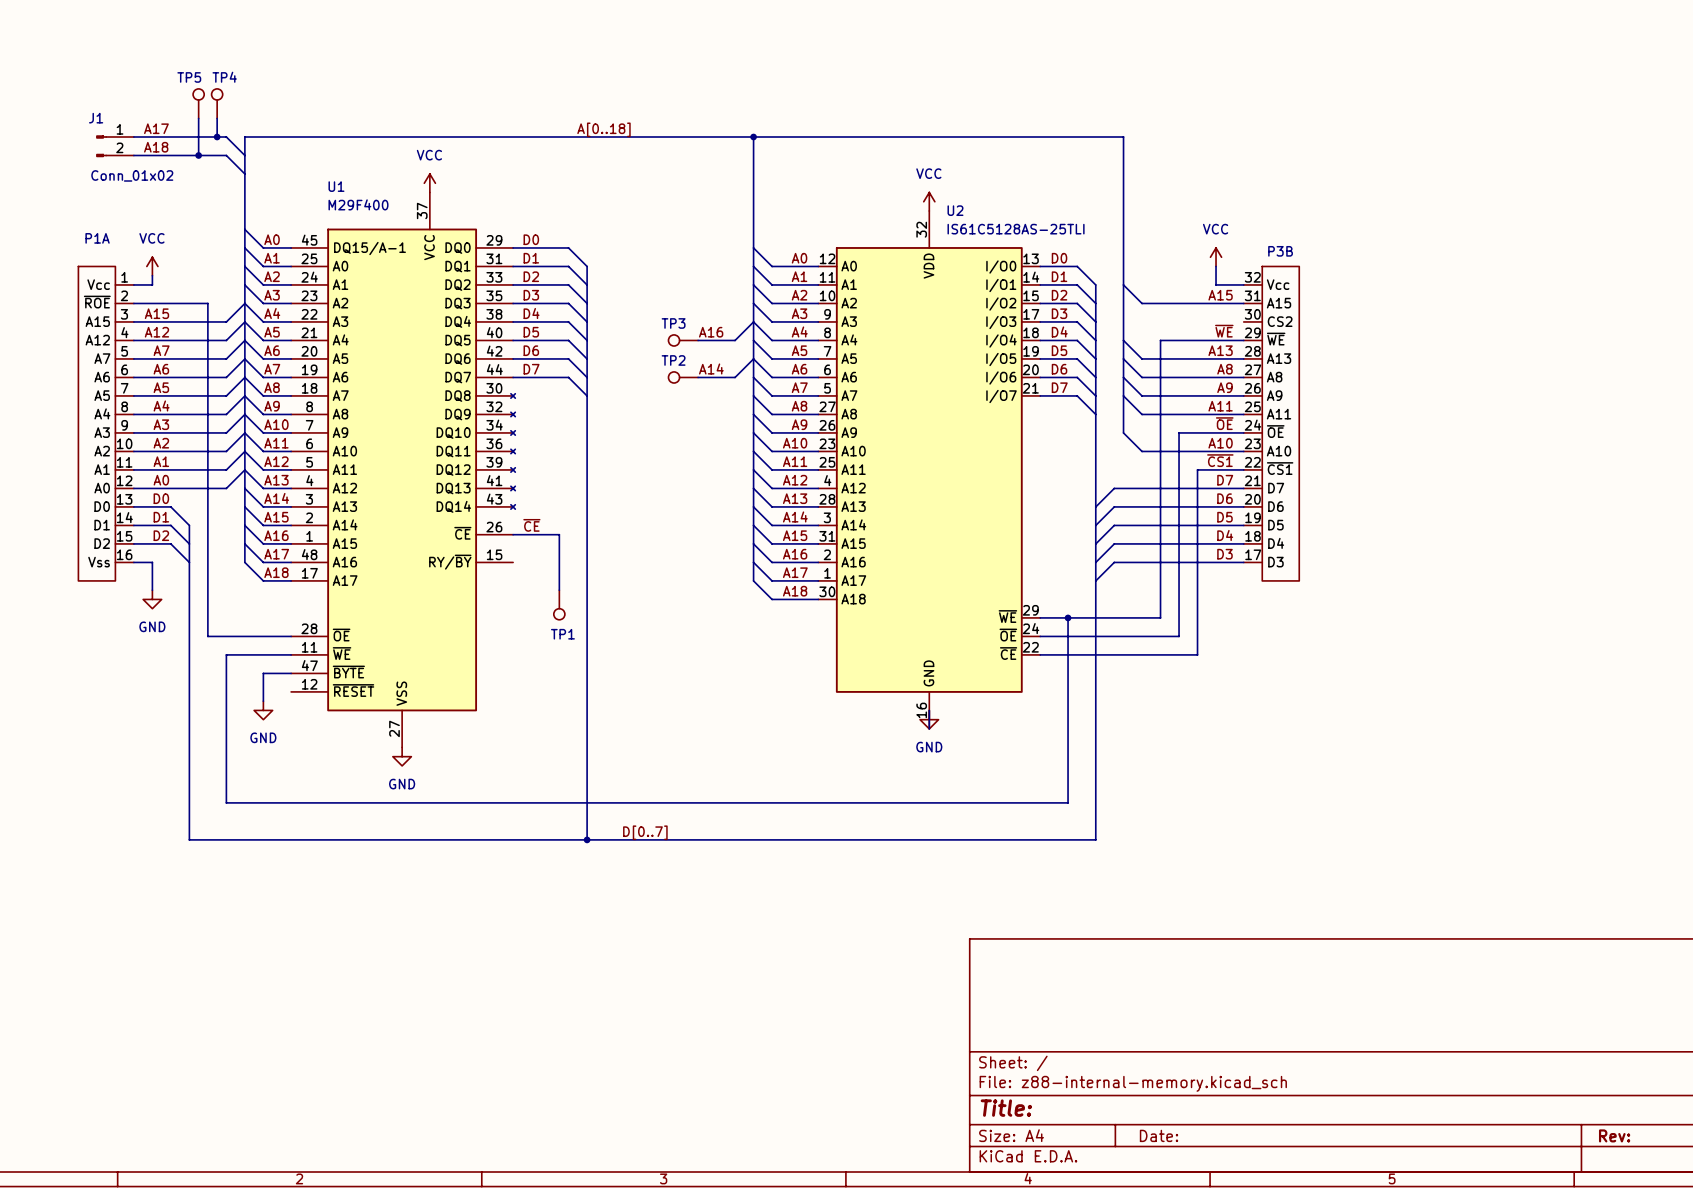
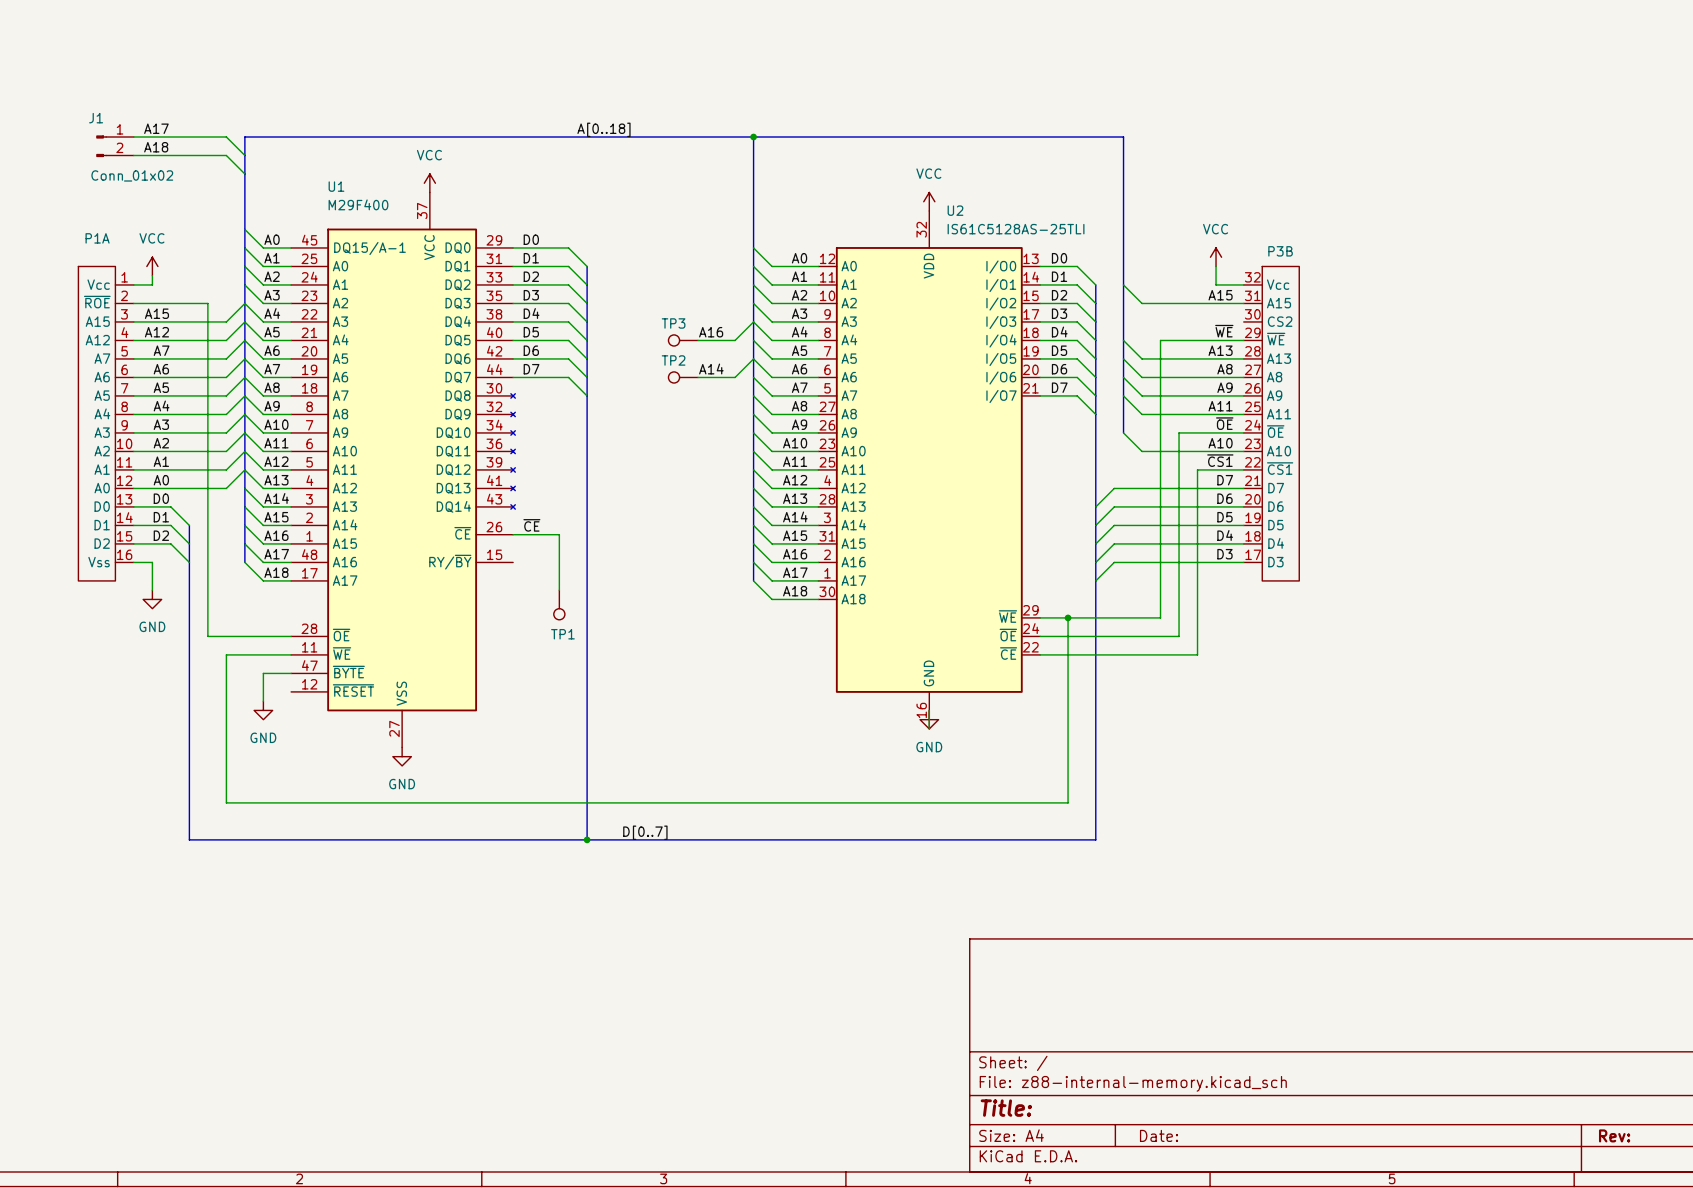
TP5: (198, 103) -> none
TP4: (217, 103) -> none
wire: (198, 118) (198, 155) -> none
wire: (217, 118) (217, 137) -> none
junction: (217, 137) -> none
junction: (198, 155) -> none

